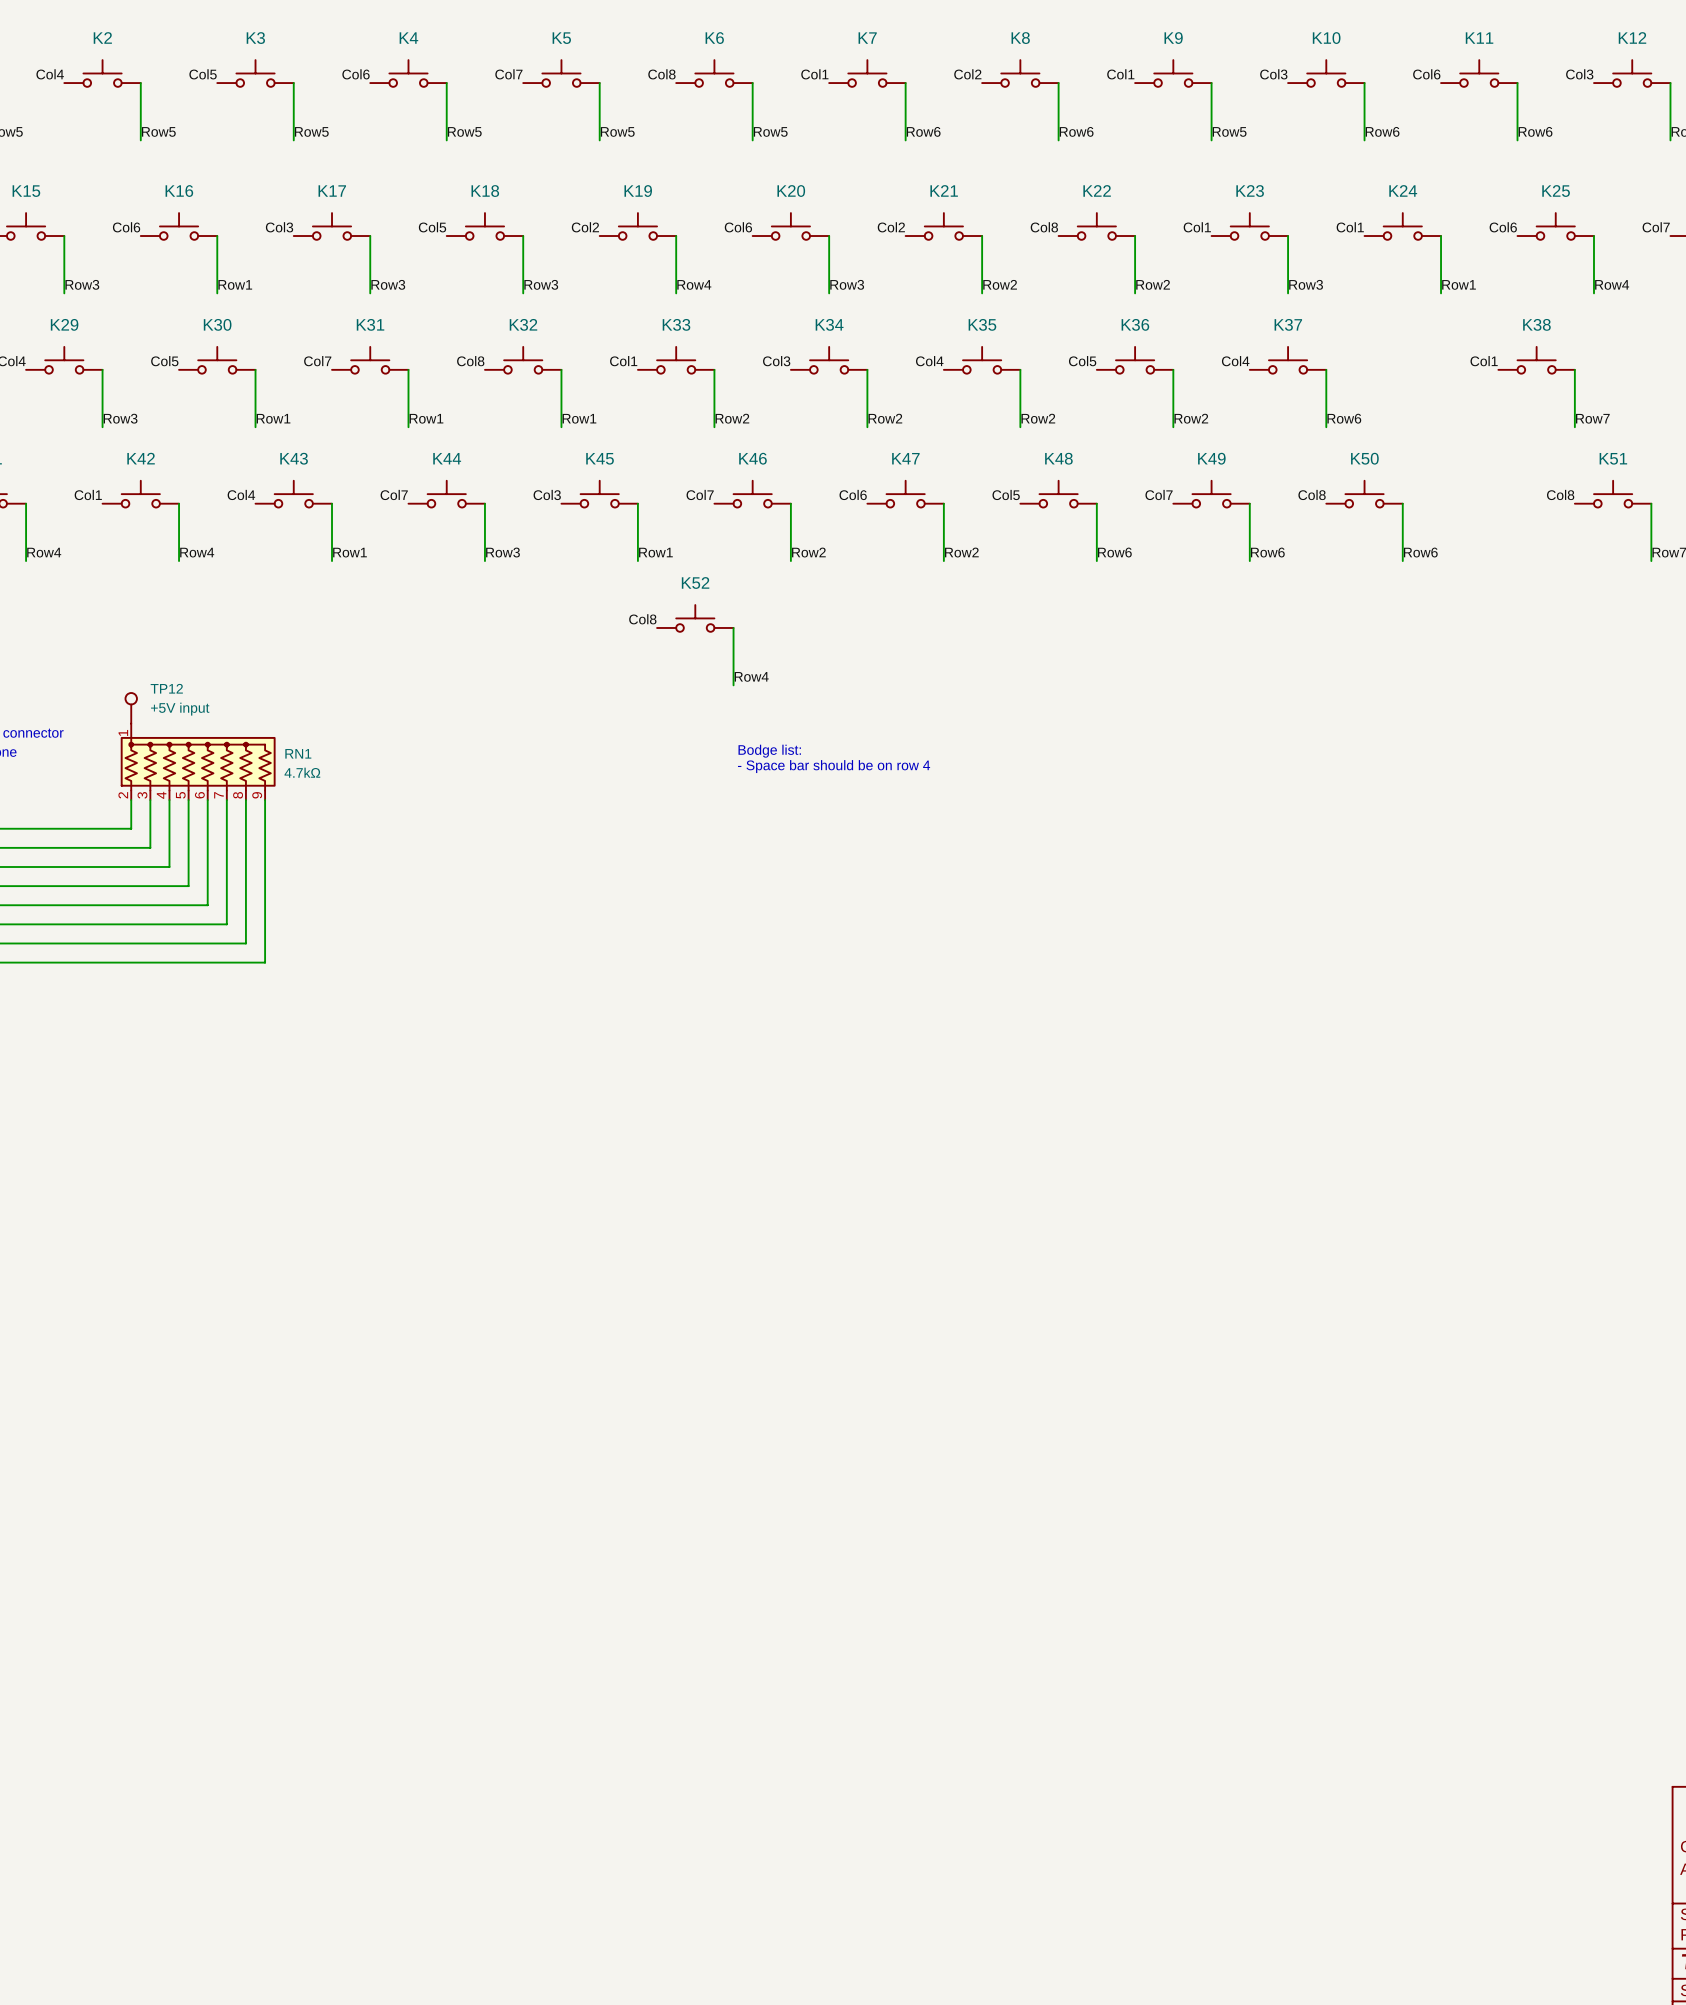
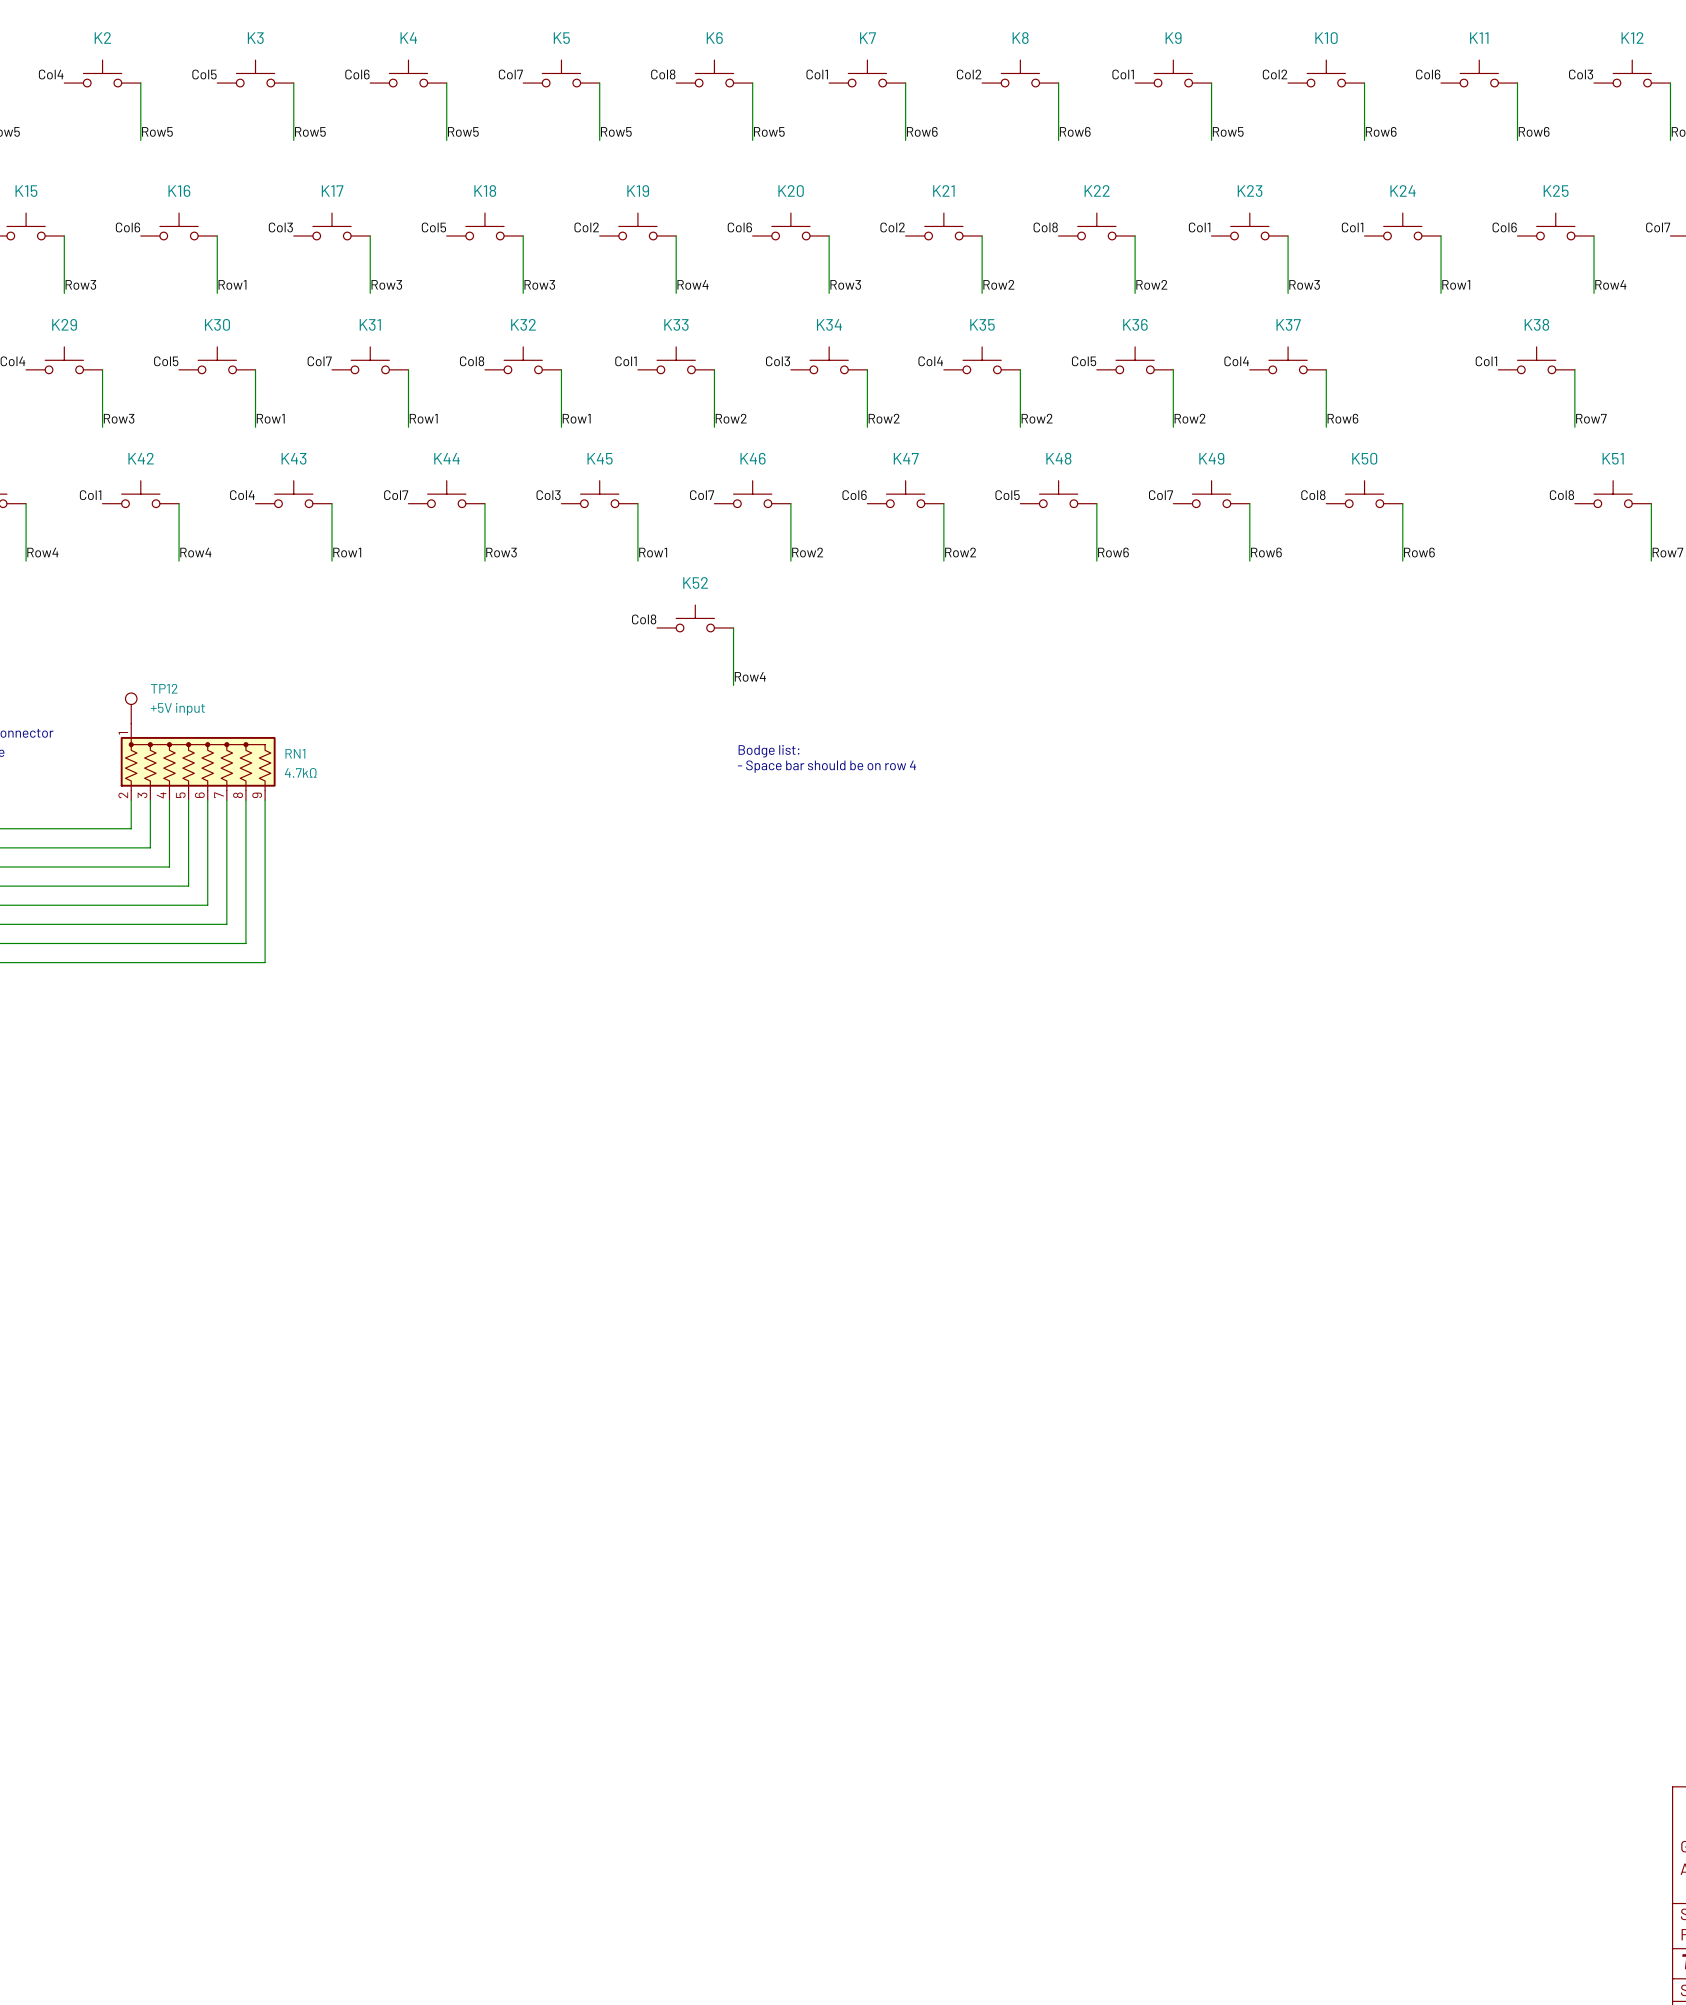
label: Col3 (1273, 74) -> Col2 (1275, 74)

